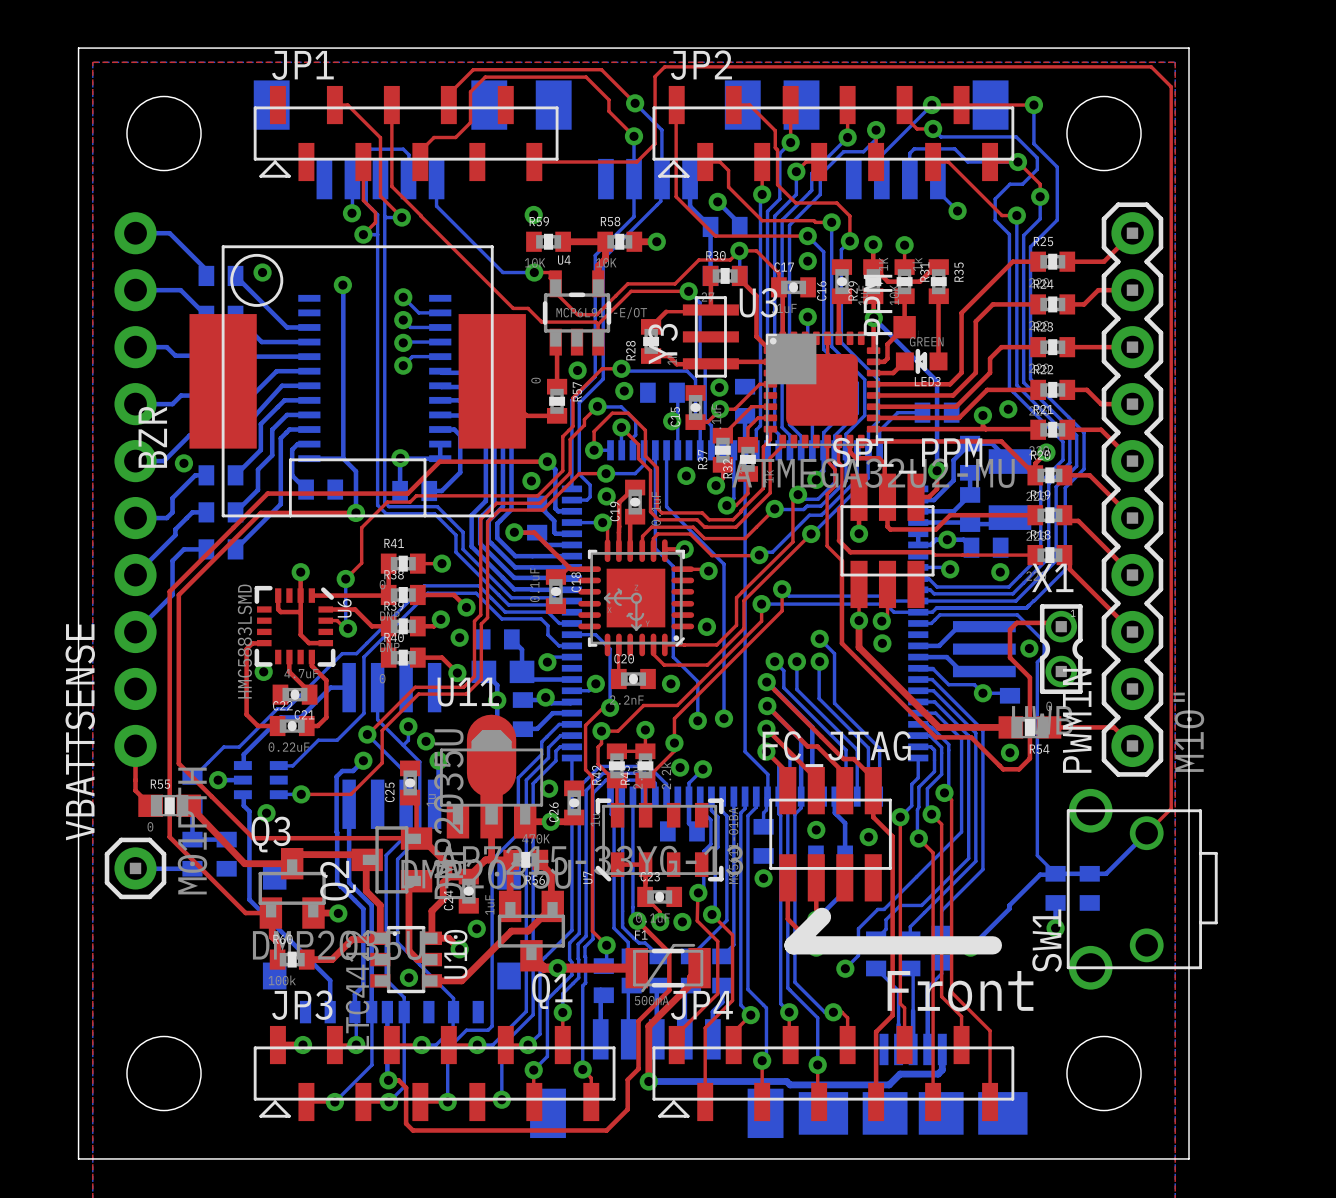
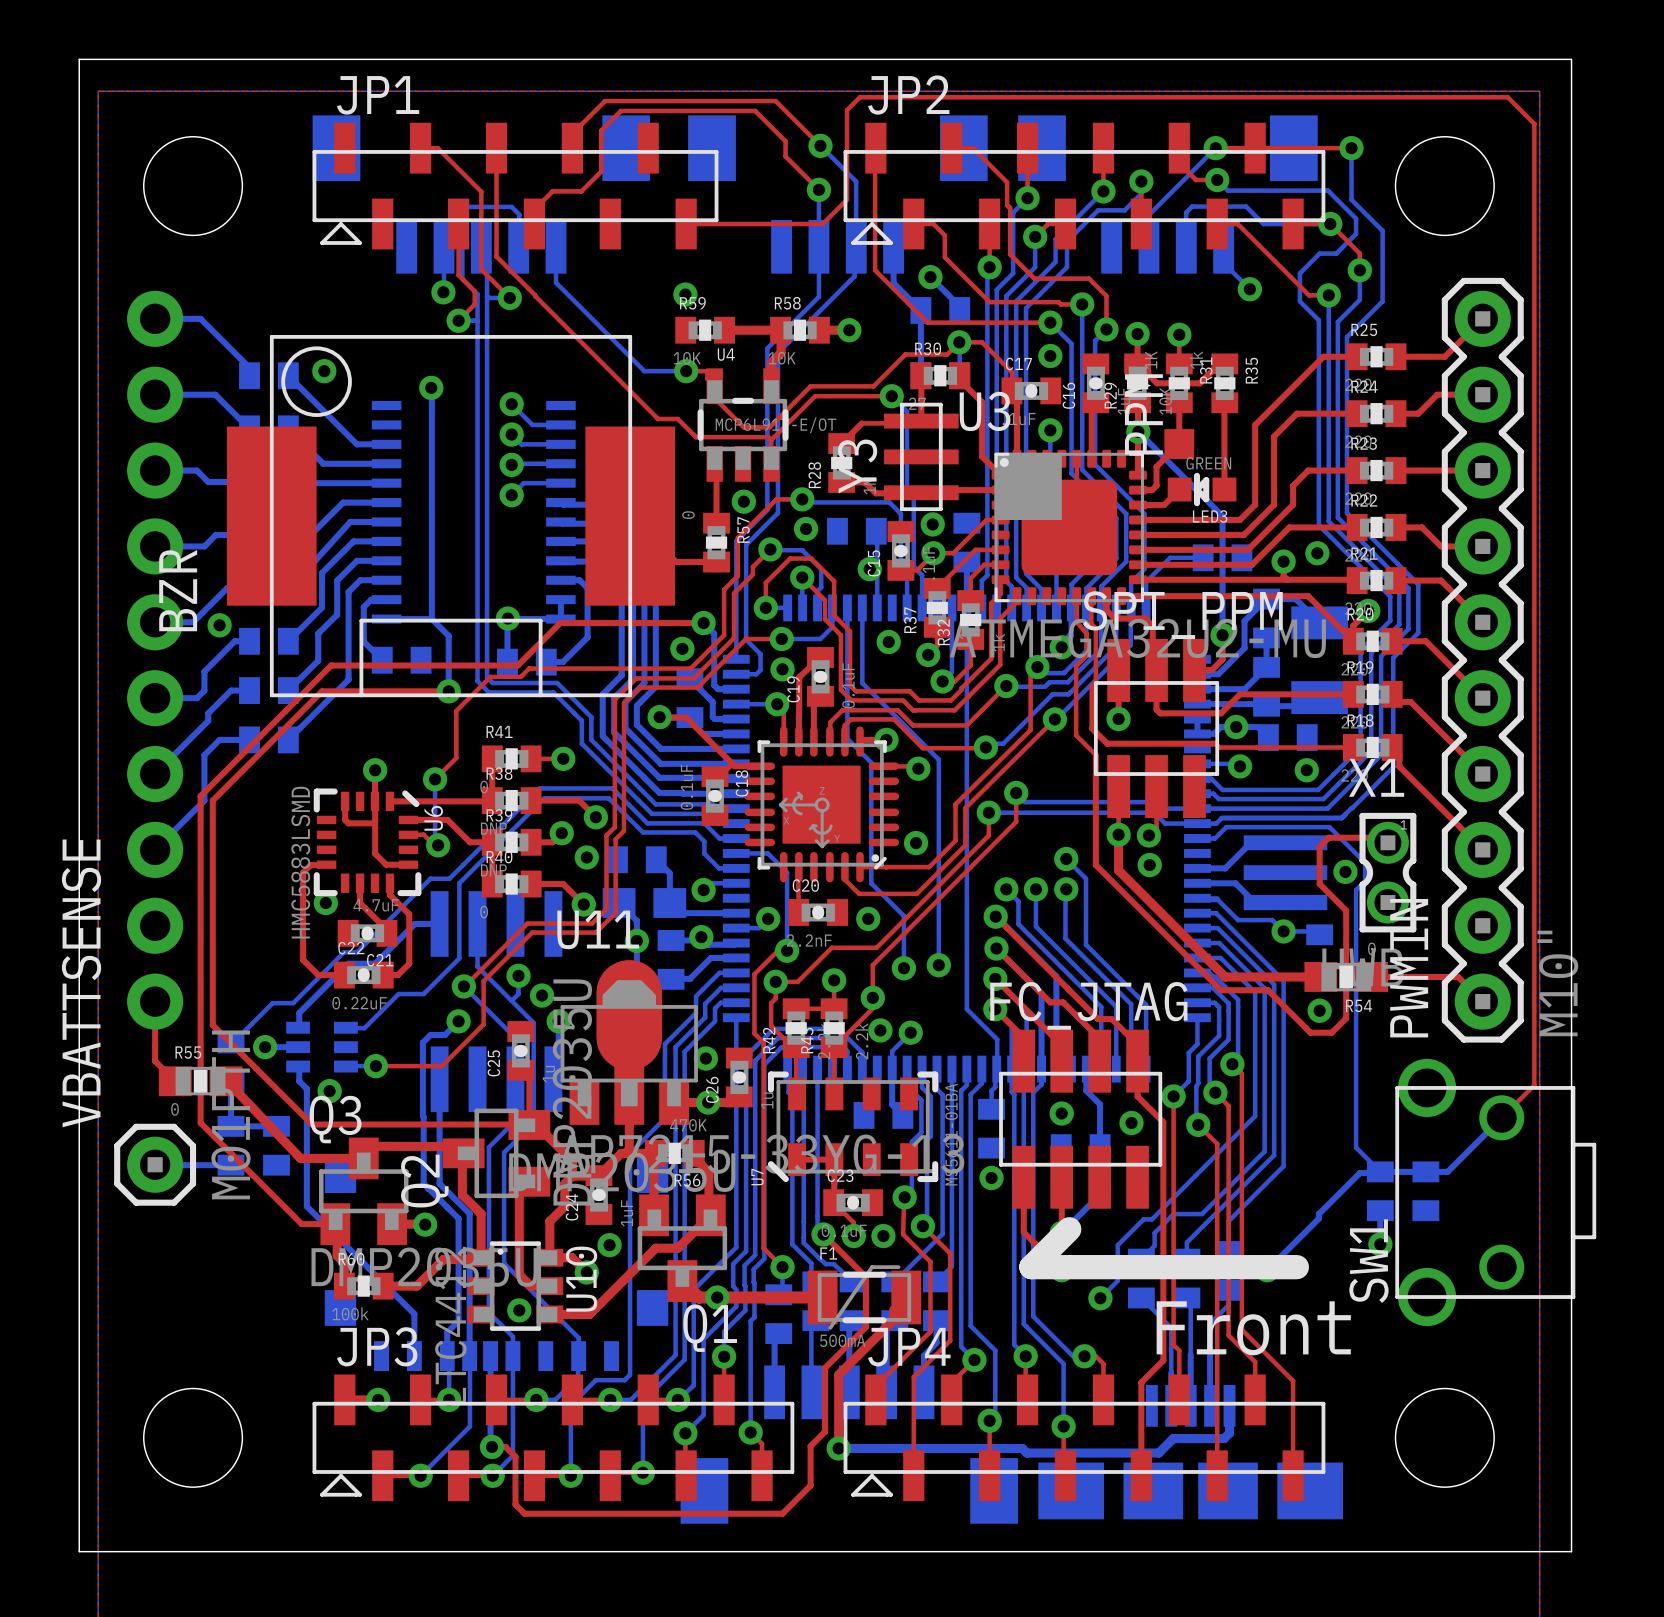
board edge: (78, 48) (1189, 48) (1189, 1158) -> (79, 72) (79, 59) (1571, 59) (1571, 1551) (1558, 1551)

